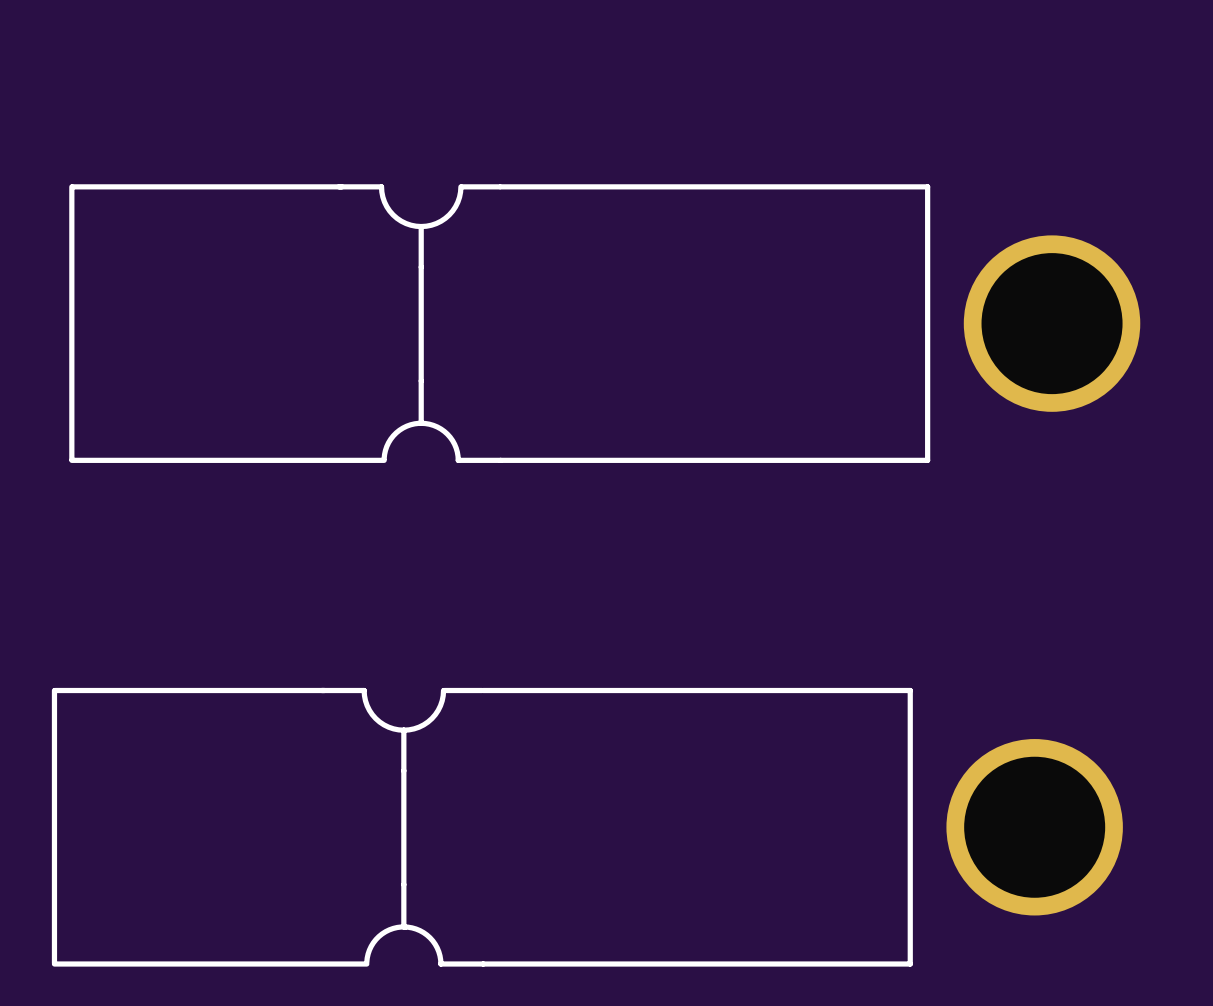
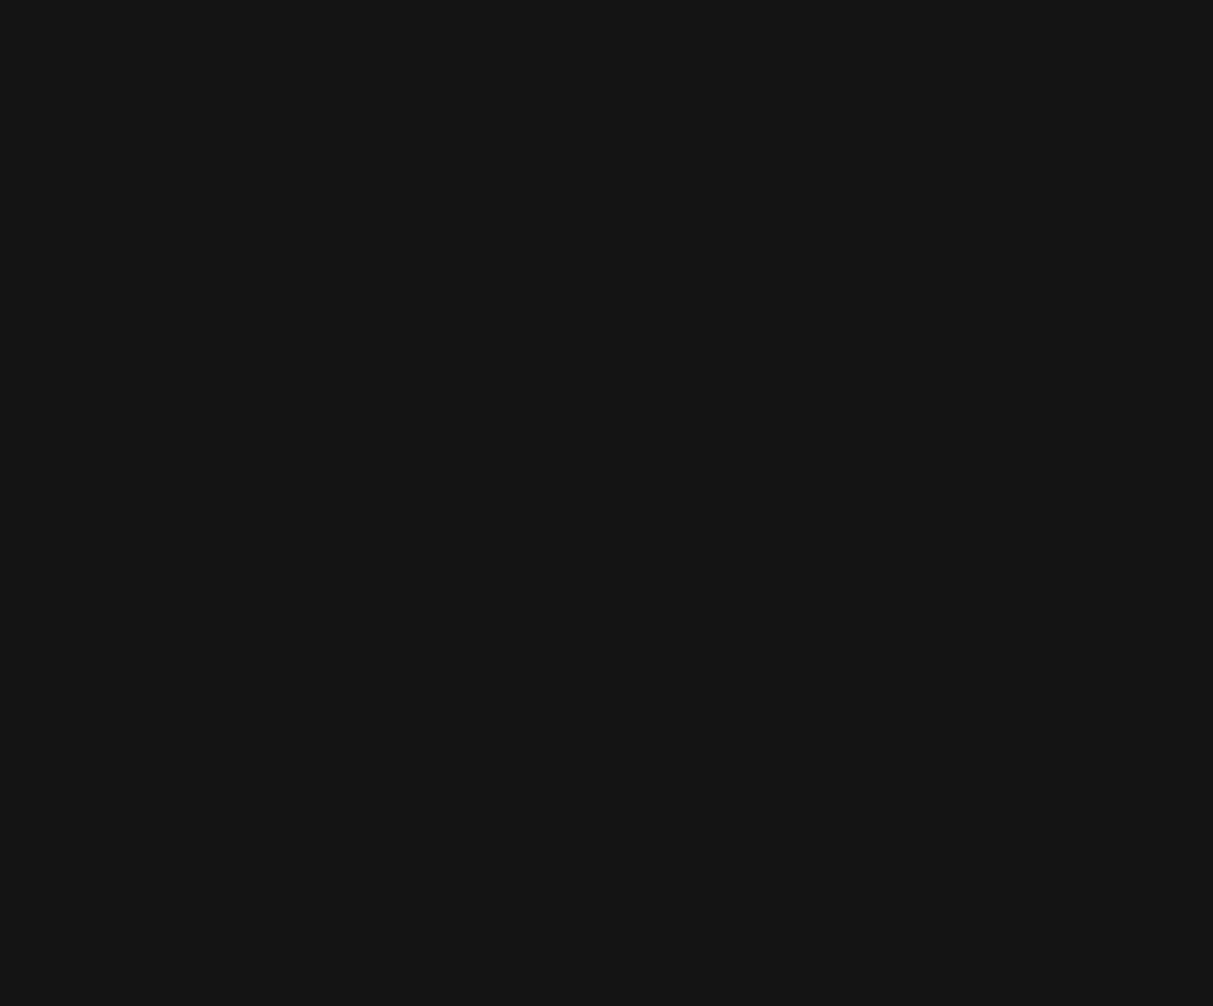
part: (604, 323) -> none
part: (587, 827) -> none

